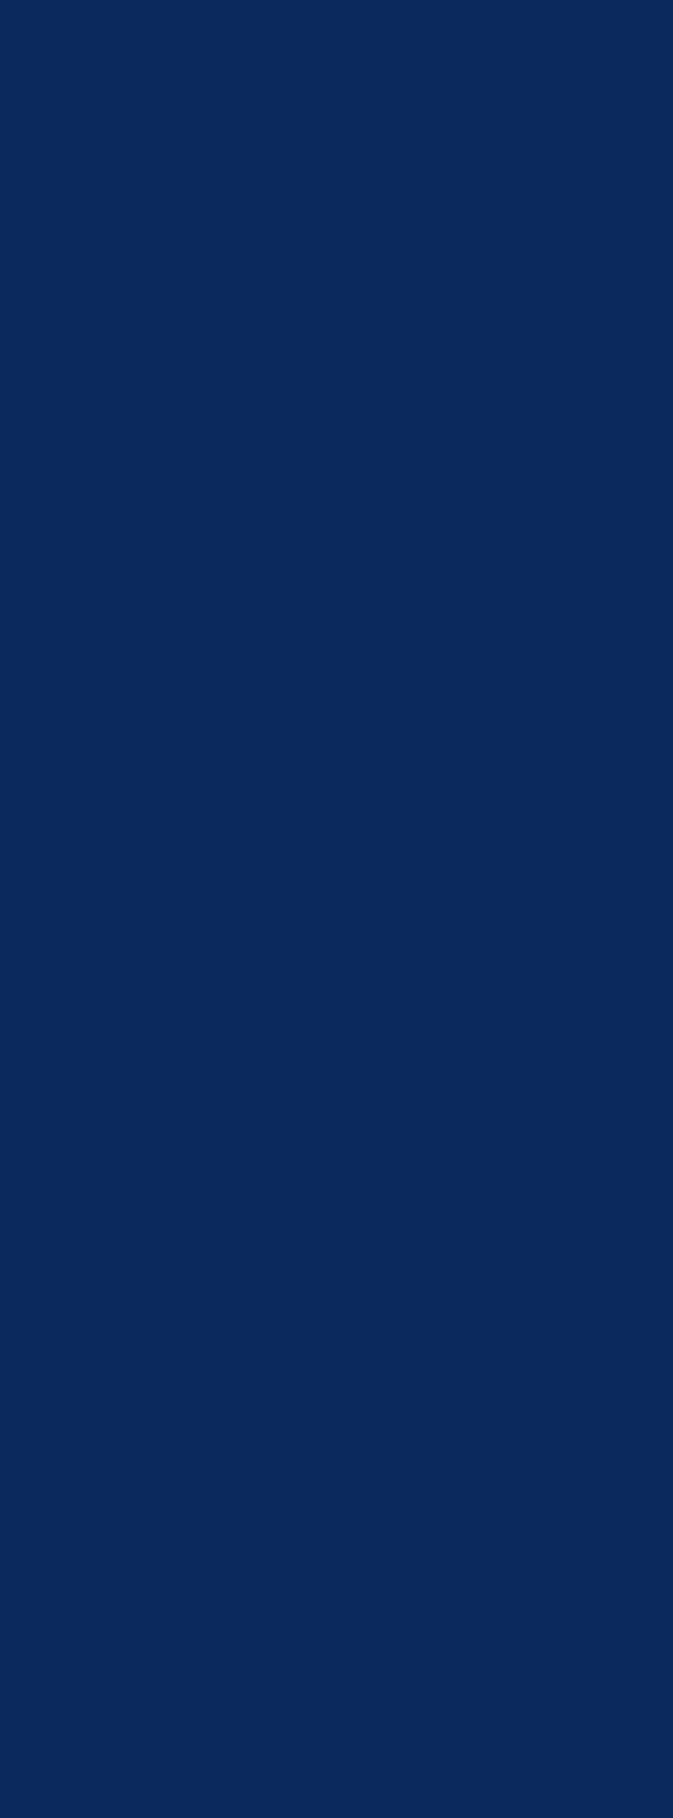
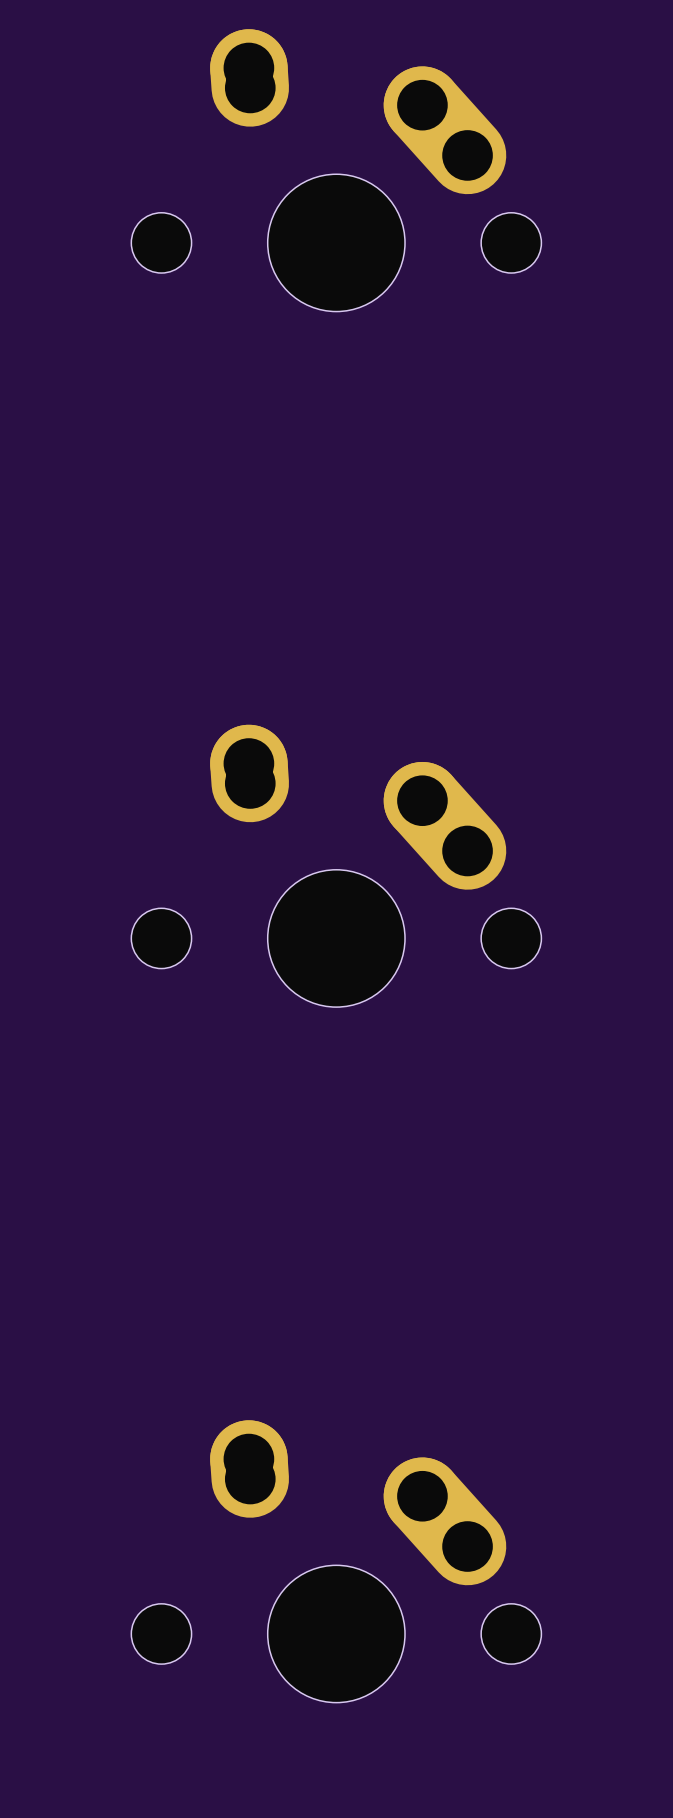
part: none -> (336, 170)
part: none -> (336, 865)
part: none -> (336, 1561)

